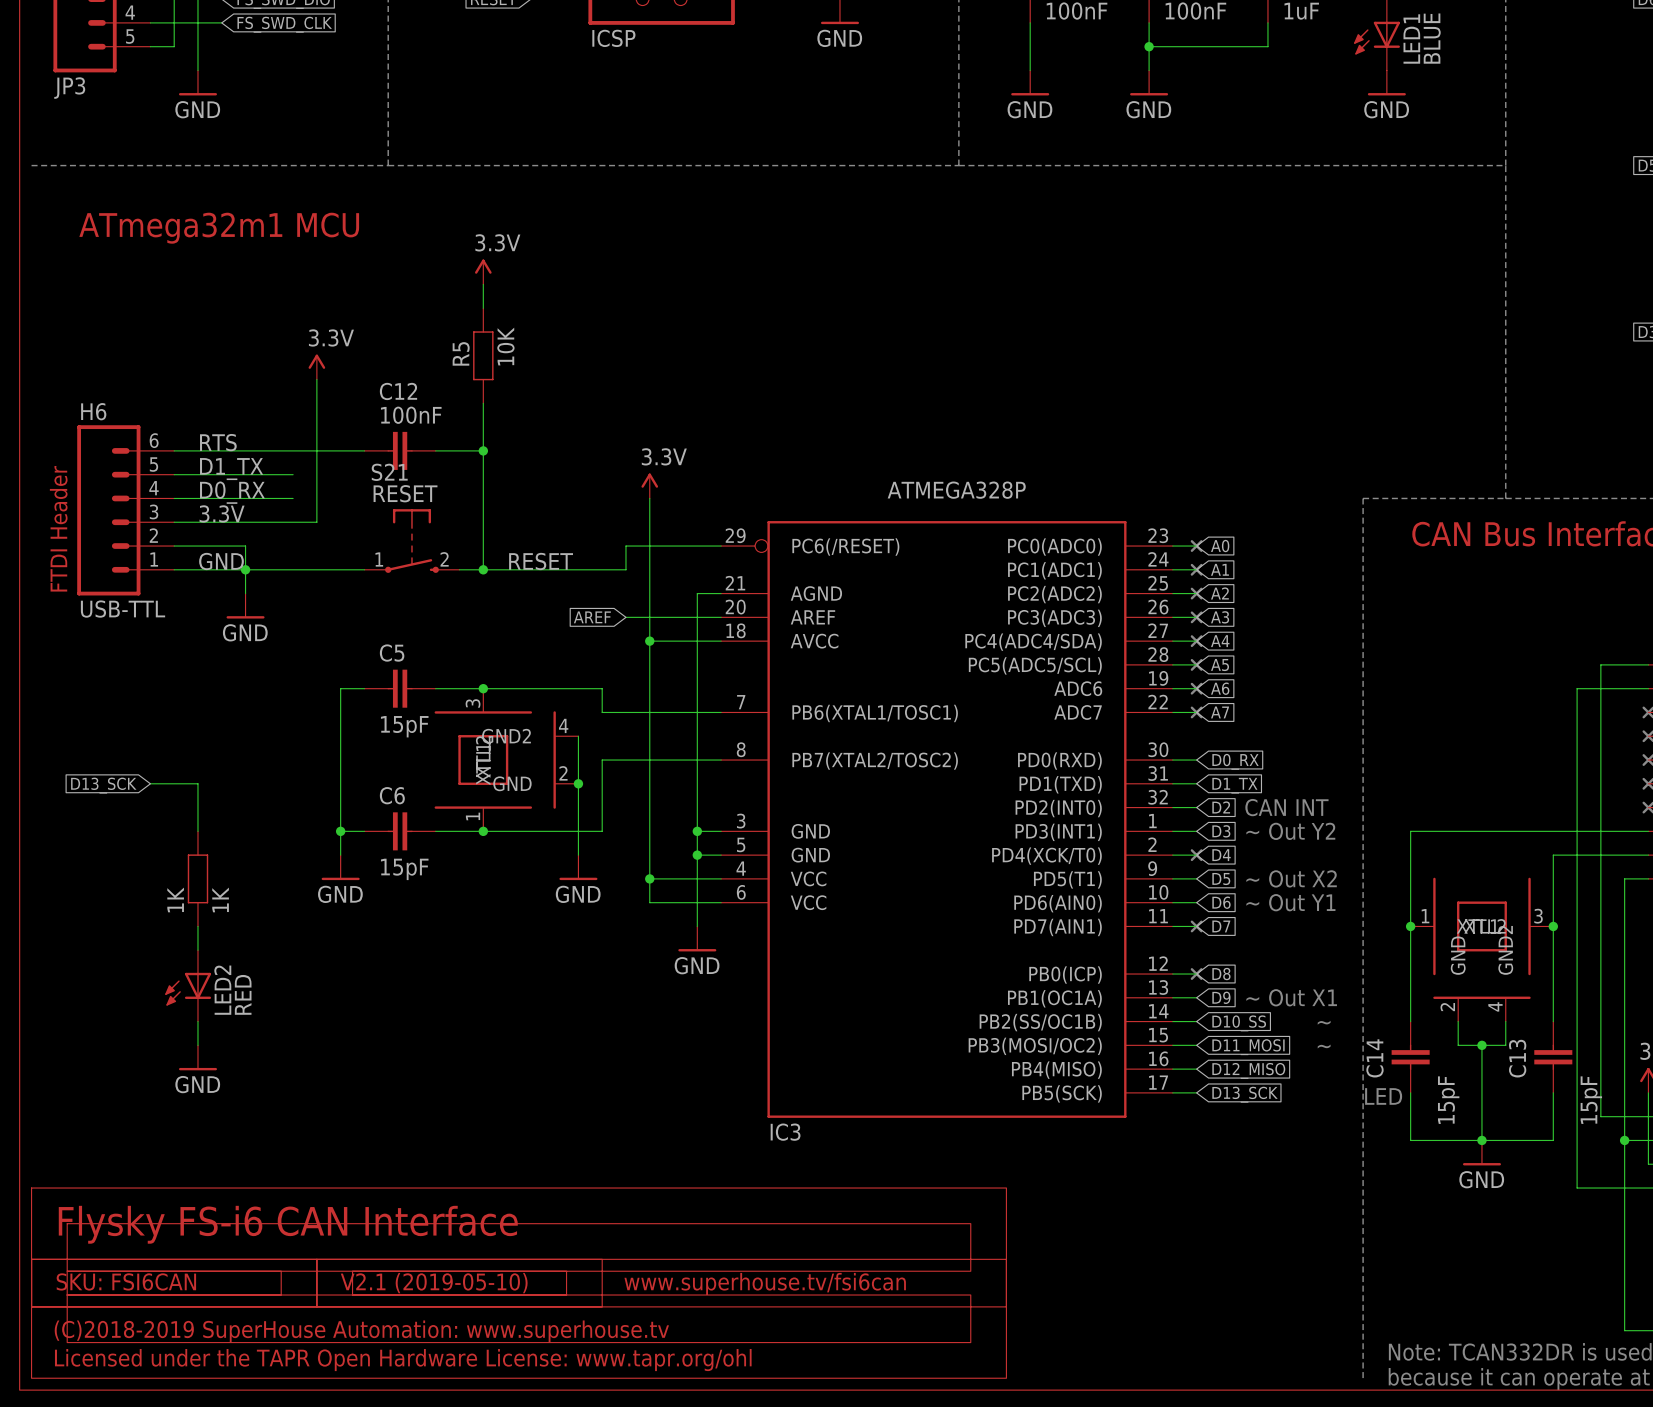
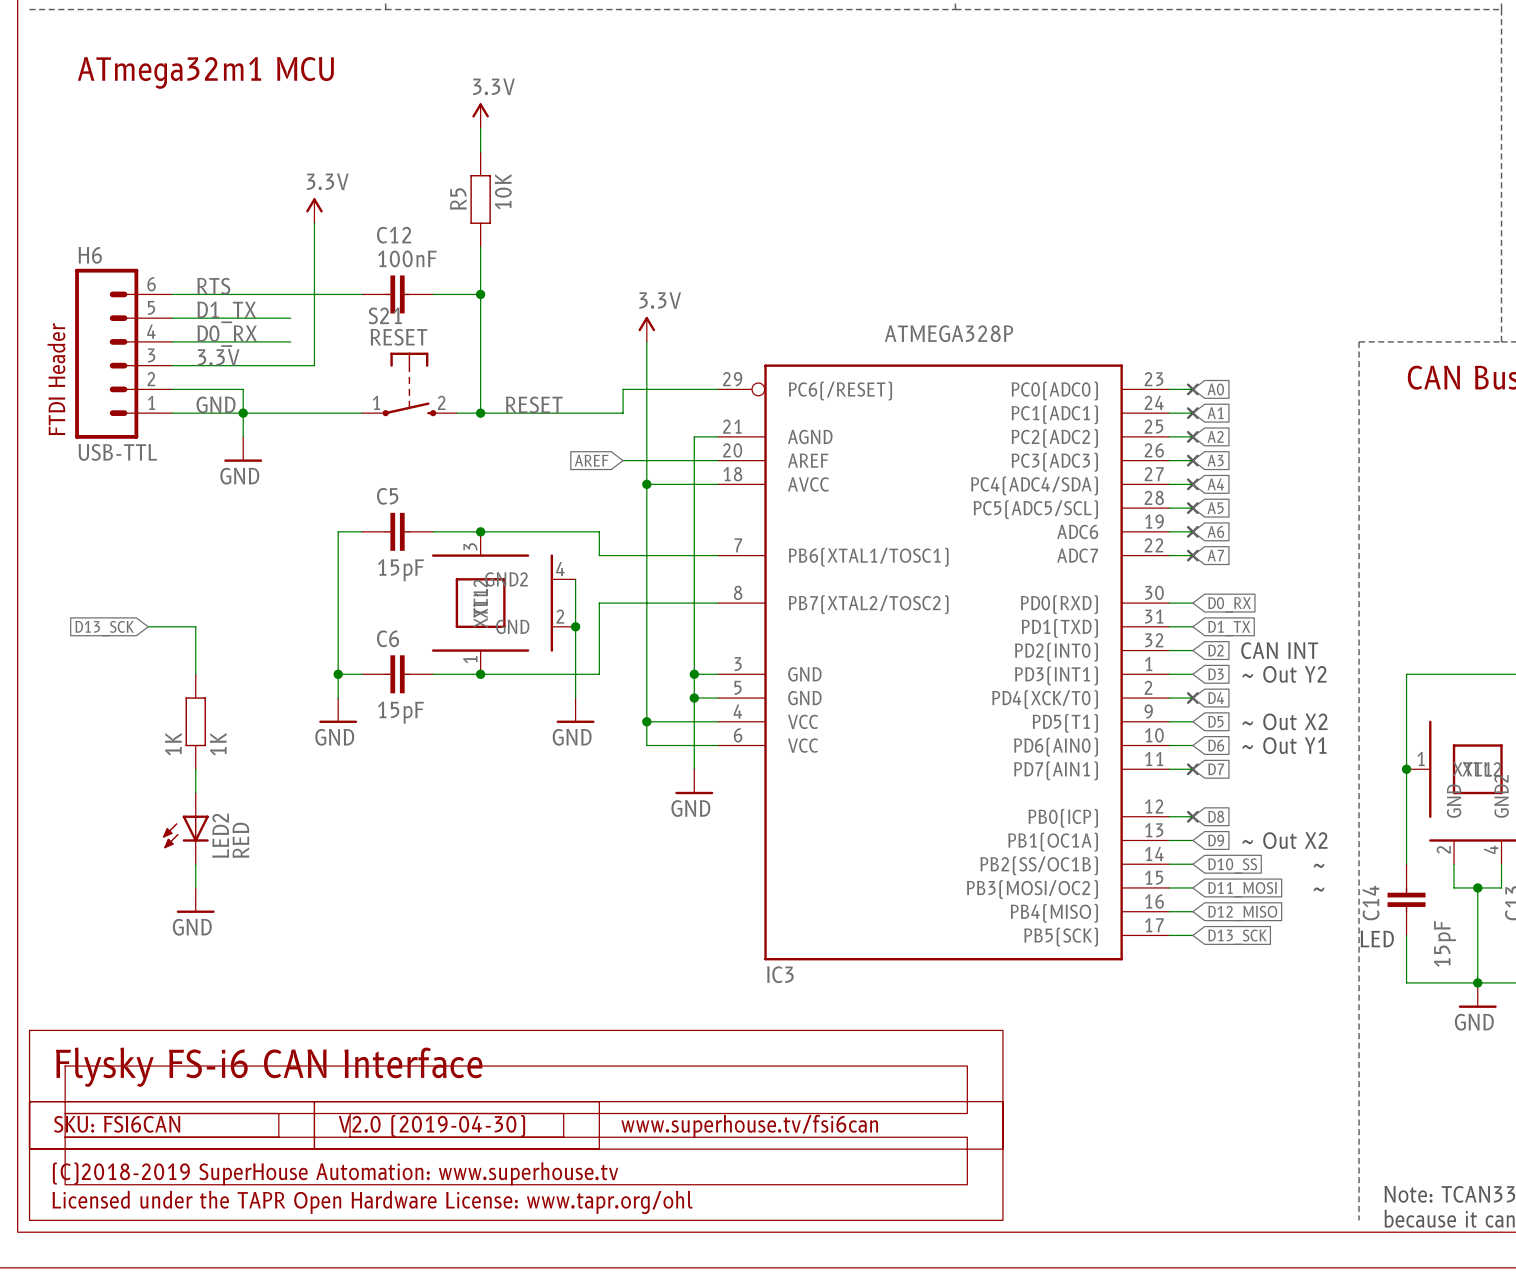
text: ~ Out X1 (1291, 997) -> ~ Out X2 (1284, 840)
text: V2.1 (2019-05-10) (434, 1283) -> V2.0 (2019-04-30) (431, 1126)

